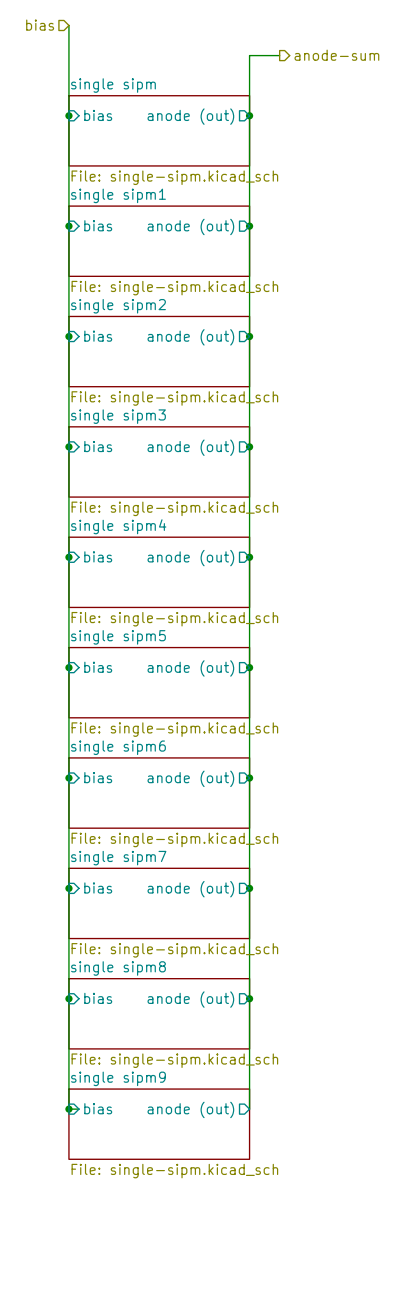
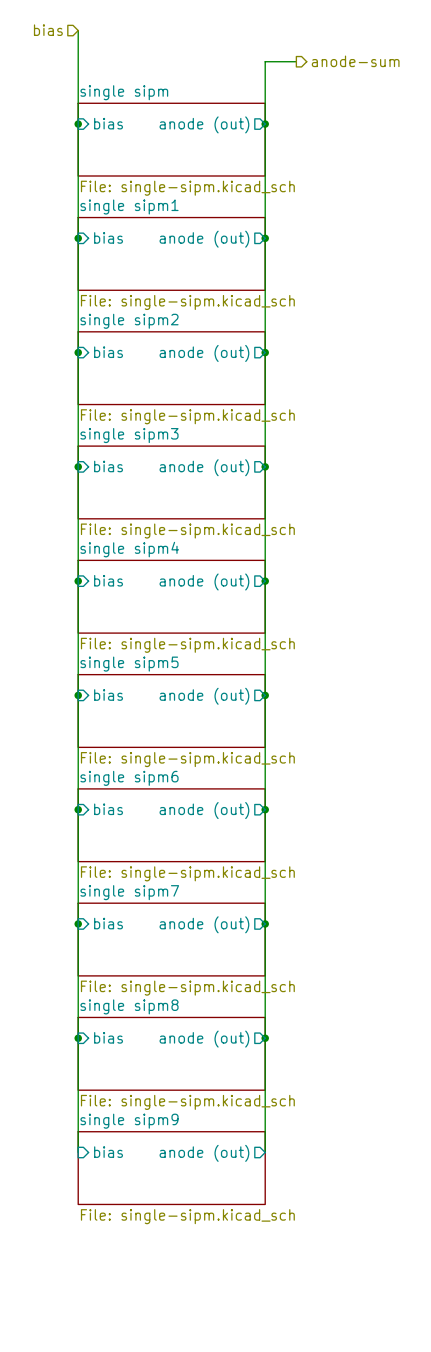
wire: (68, 1109) (78, 1109) -> none
junction: (68, 1109) -> none

